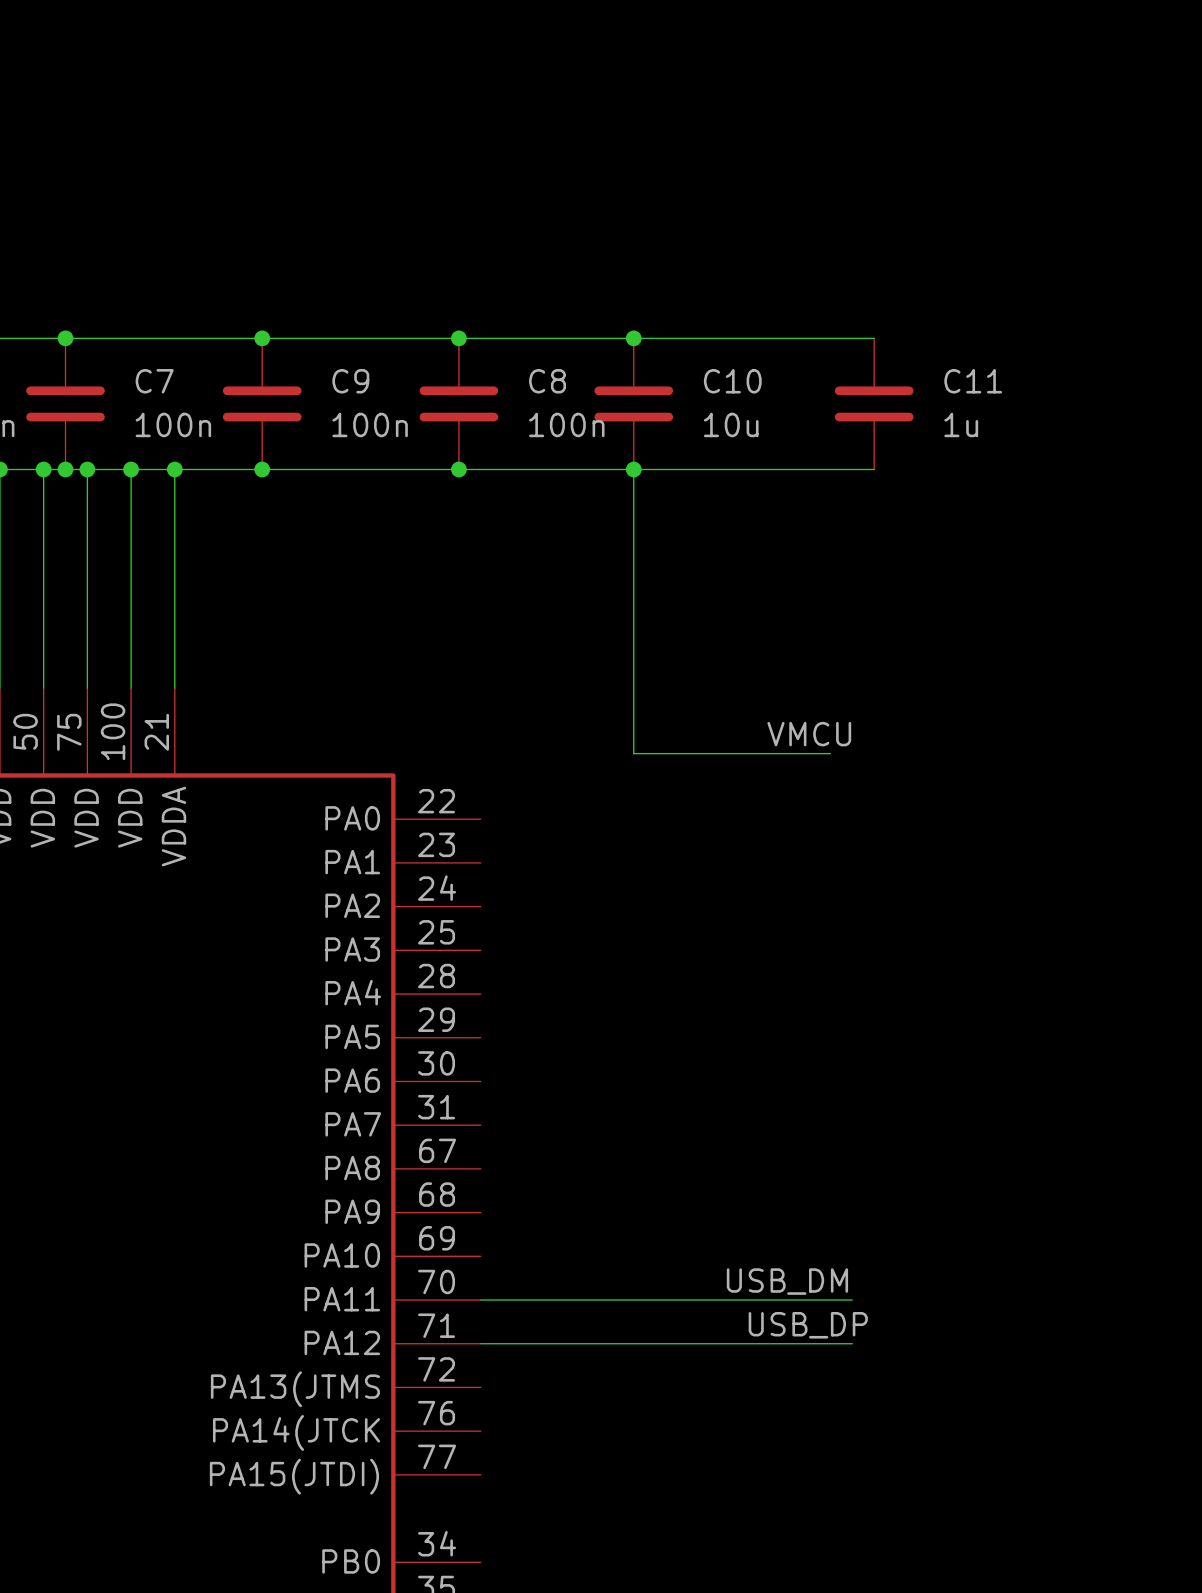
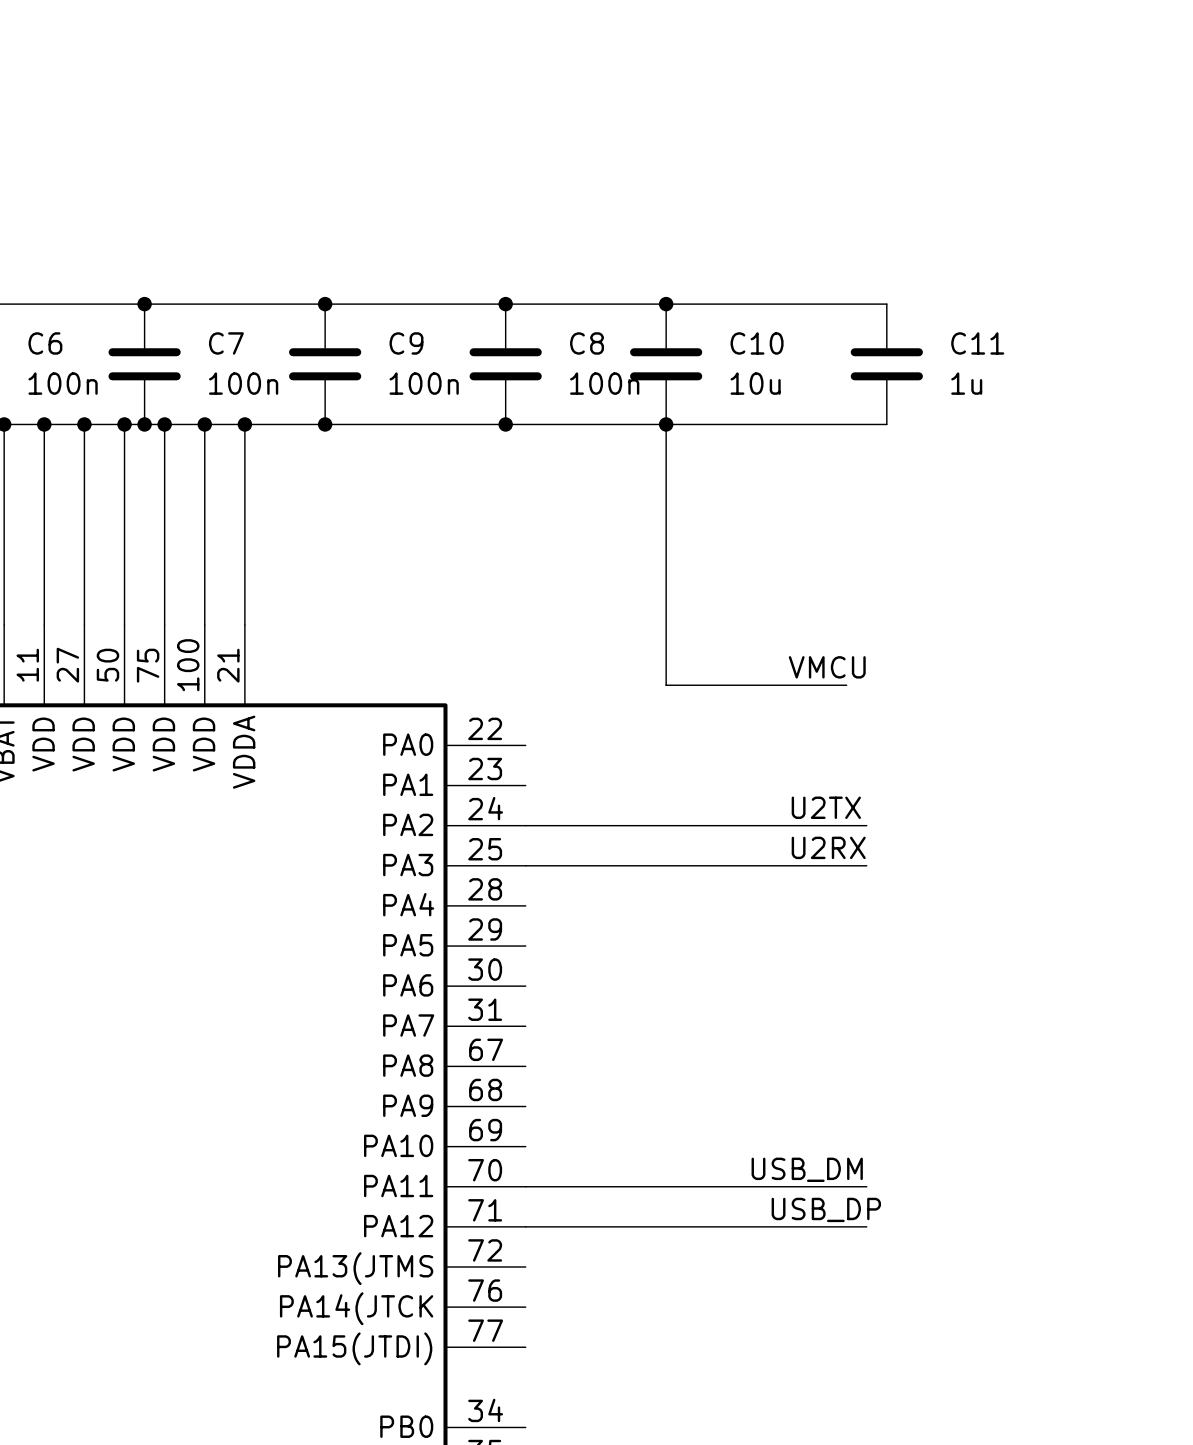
label: none -> U2TX (826, 807)
wire: none -> (525, 825) (866, 825)
label: none -> U2RX (828, 847)
wire: none -> (525, 865) (866, 865)

